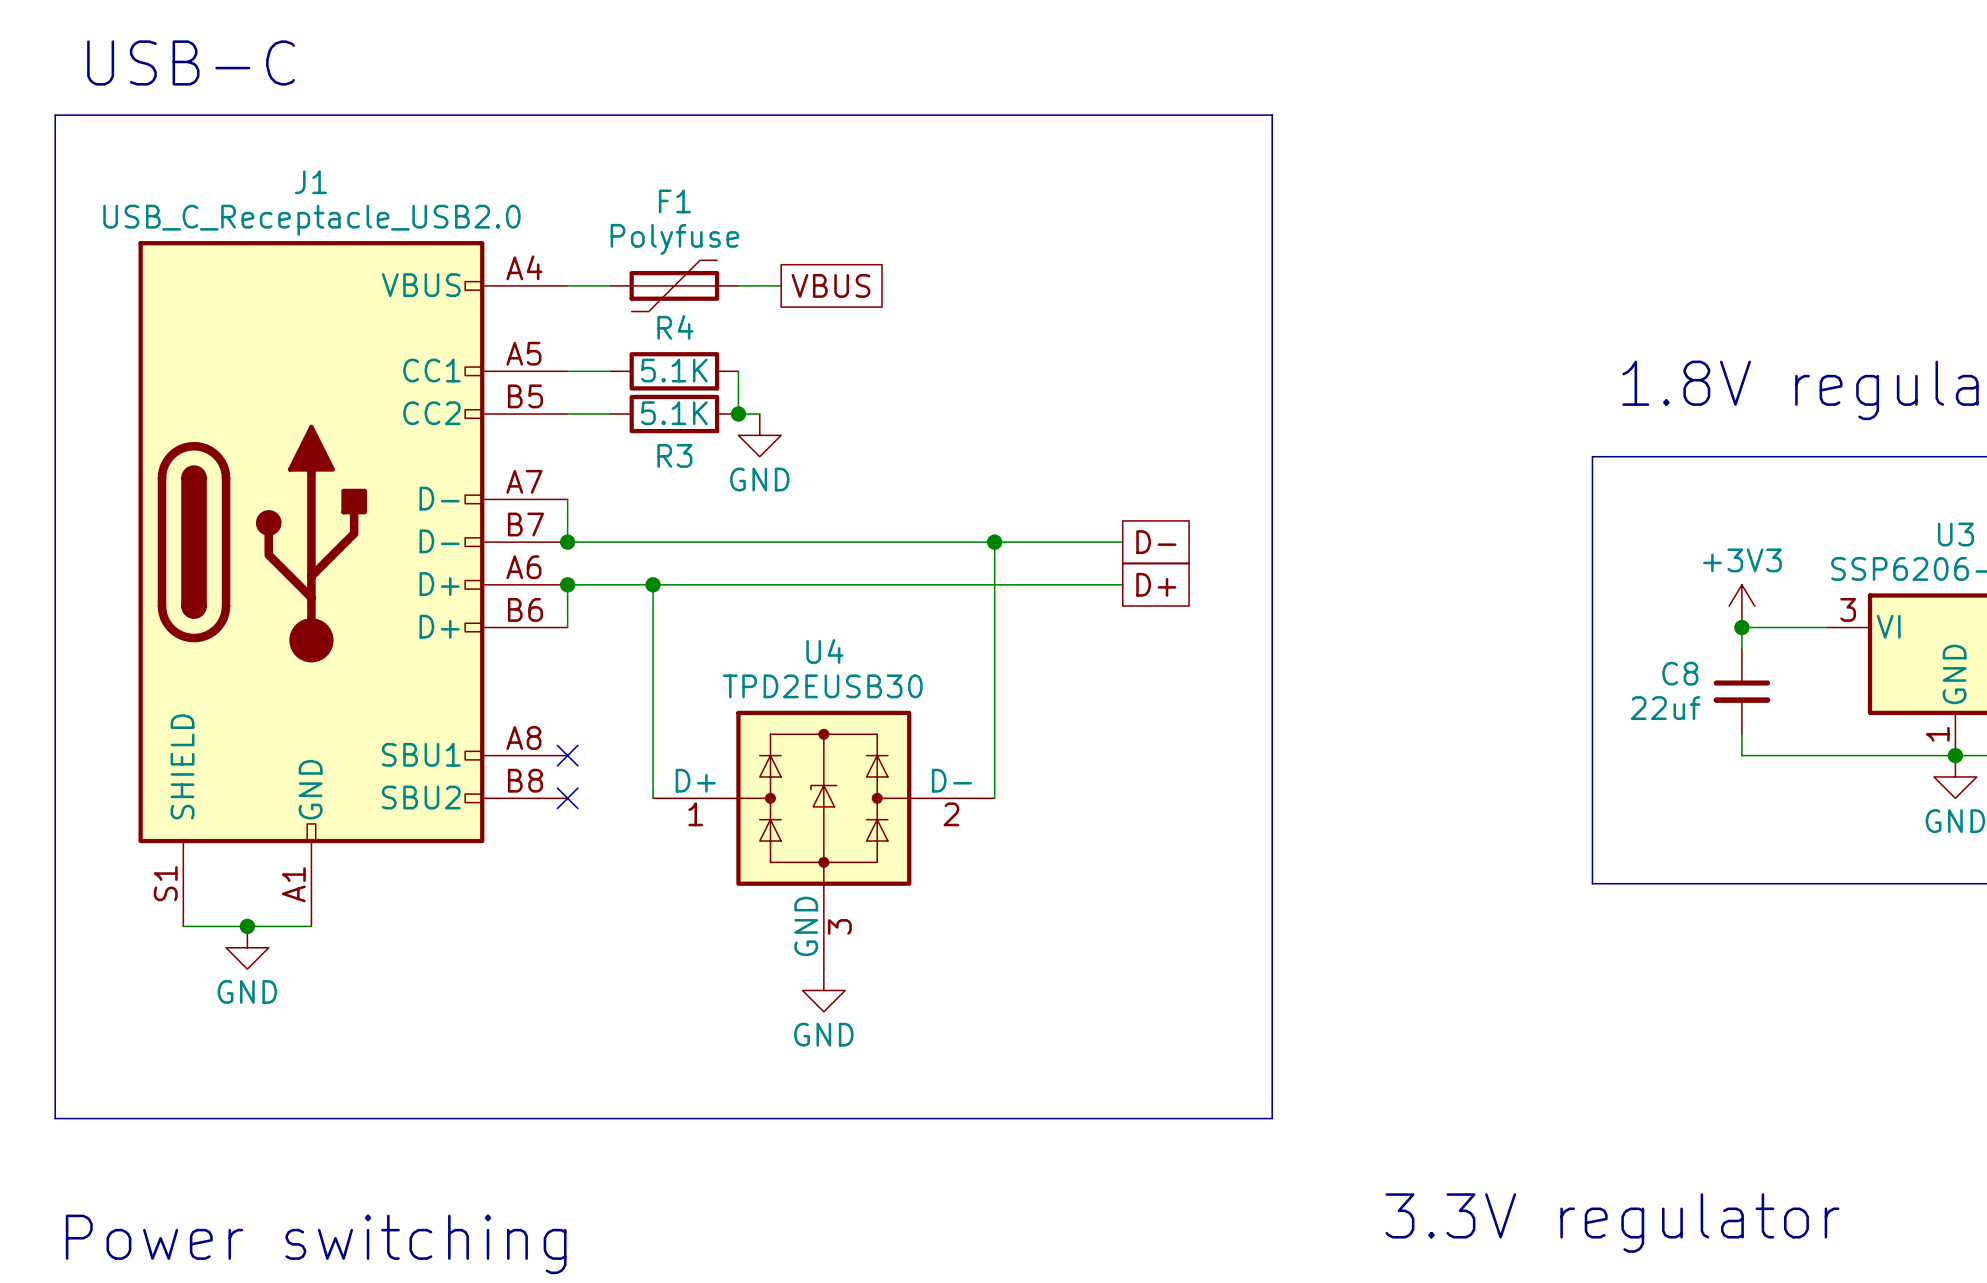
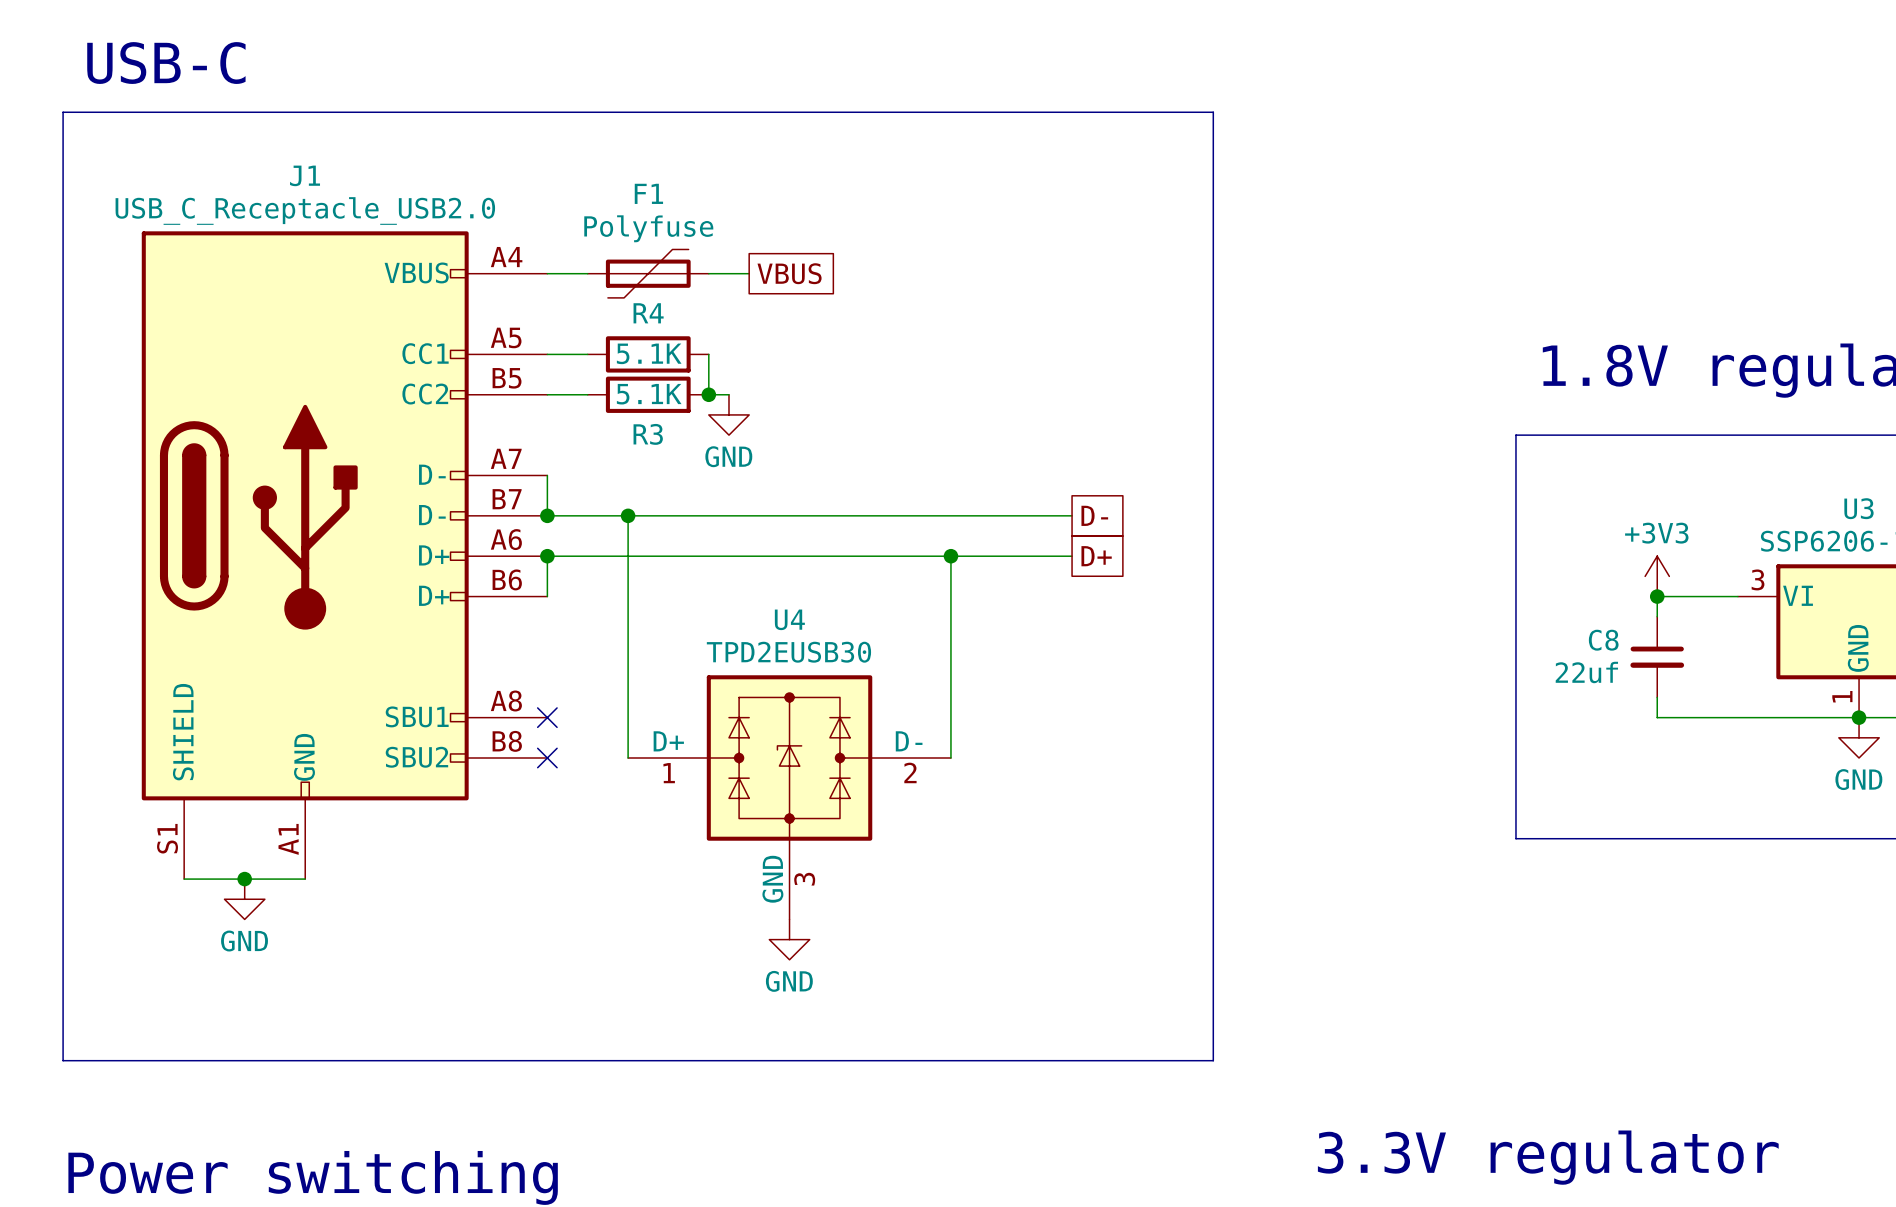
wire: (994, 542) (994, 584) -> (628, 515) (628, 556)
junction position: (994, 542) -> (950, 556)
junction position: (653, 584) -> (628, 515)

